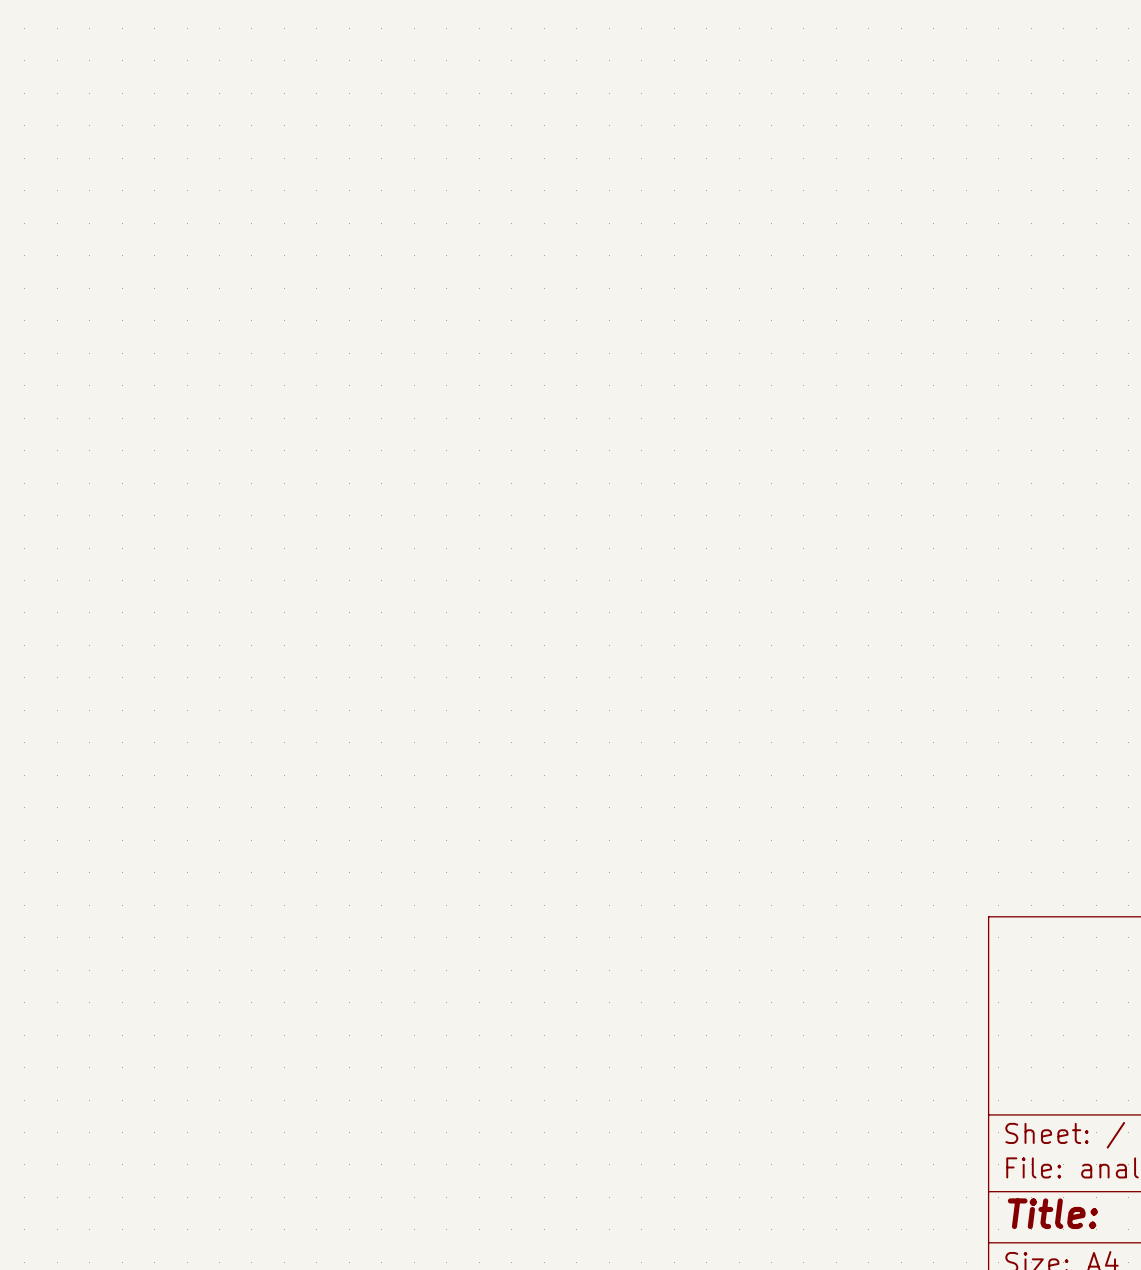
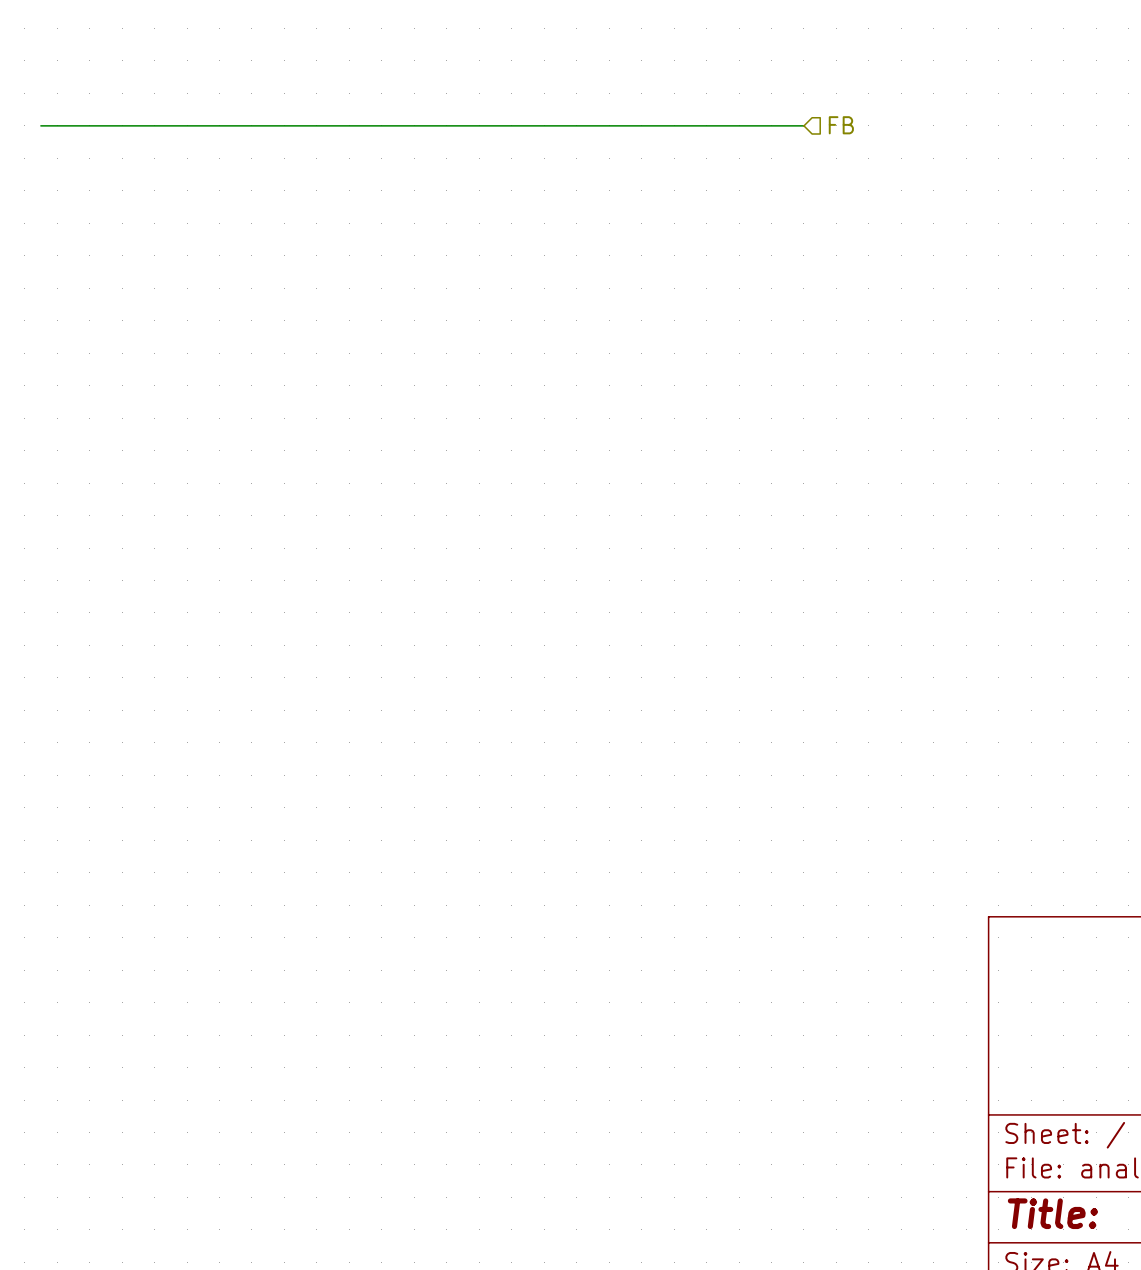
wire: none -> (40, 125) (803, 125)
hierarchical label: none -> FB (841, 125)

